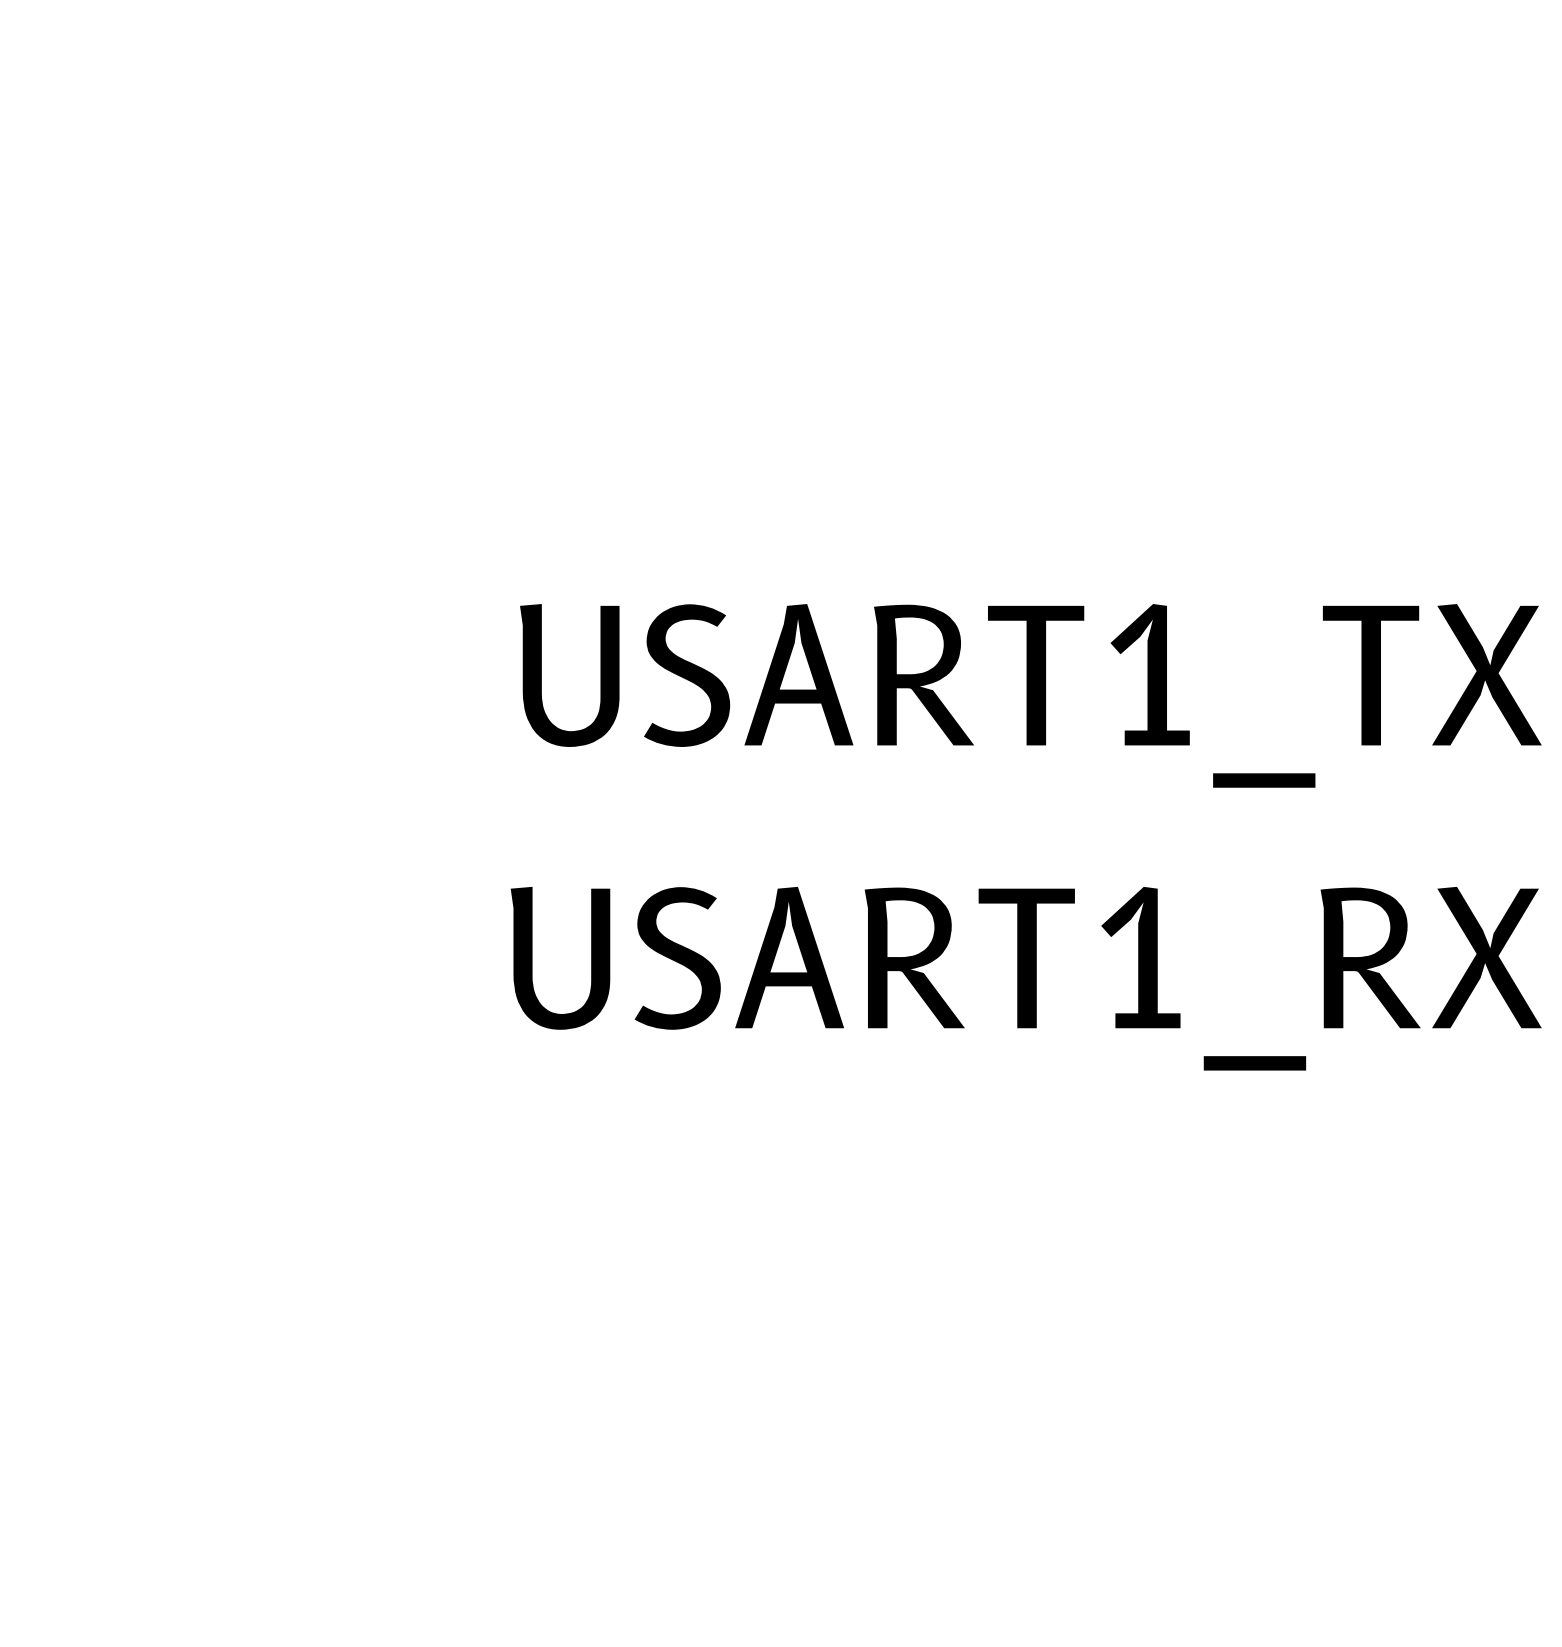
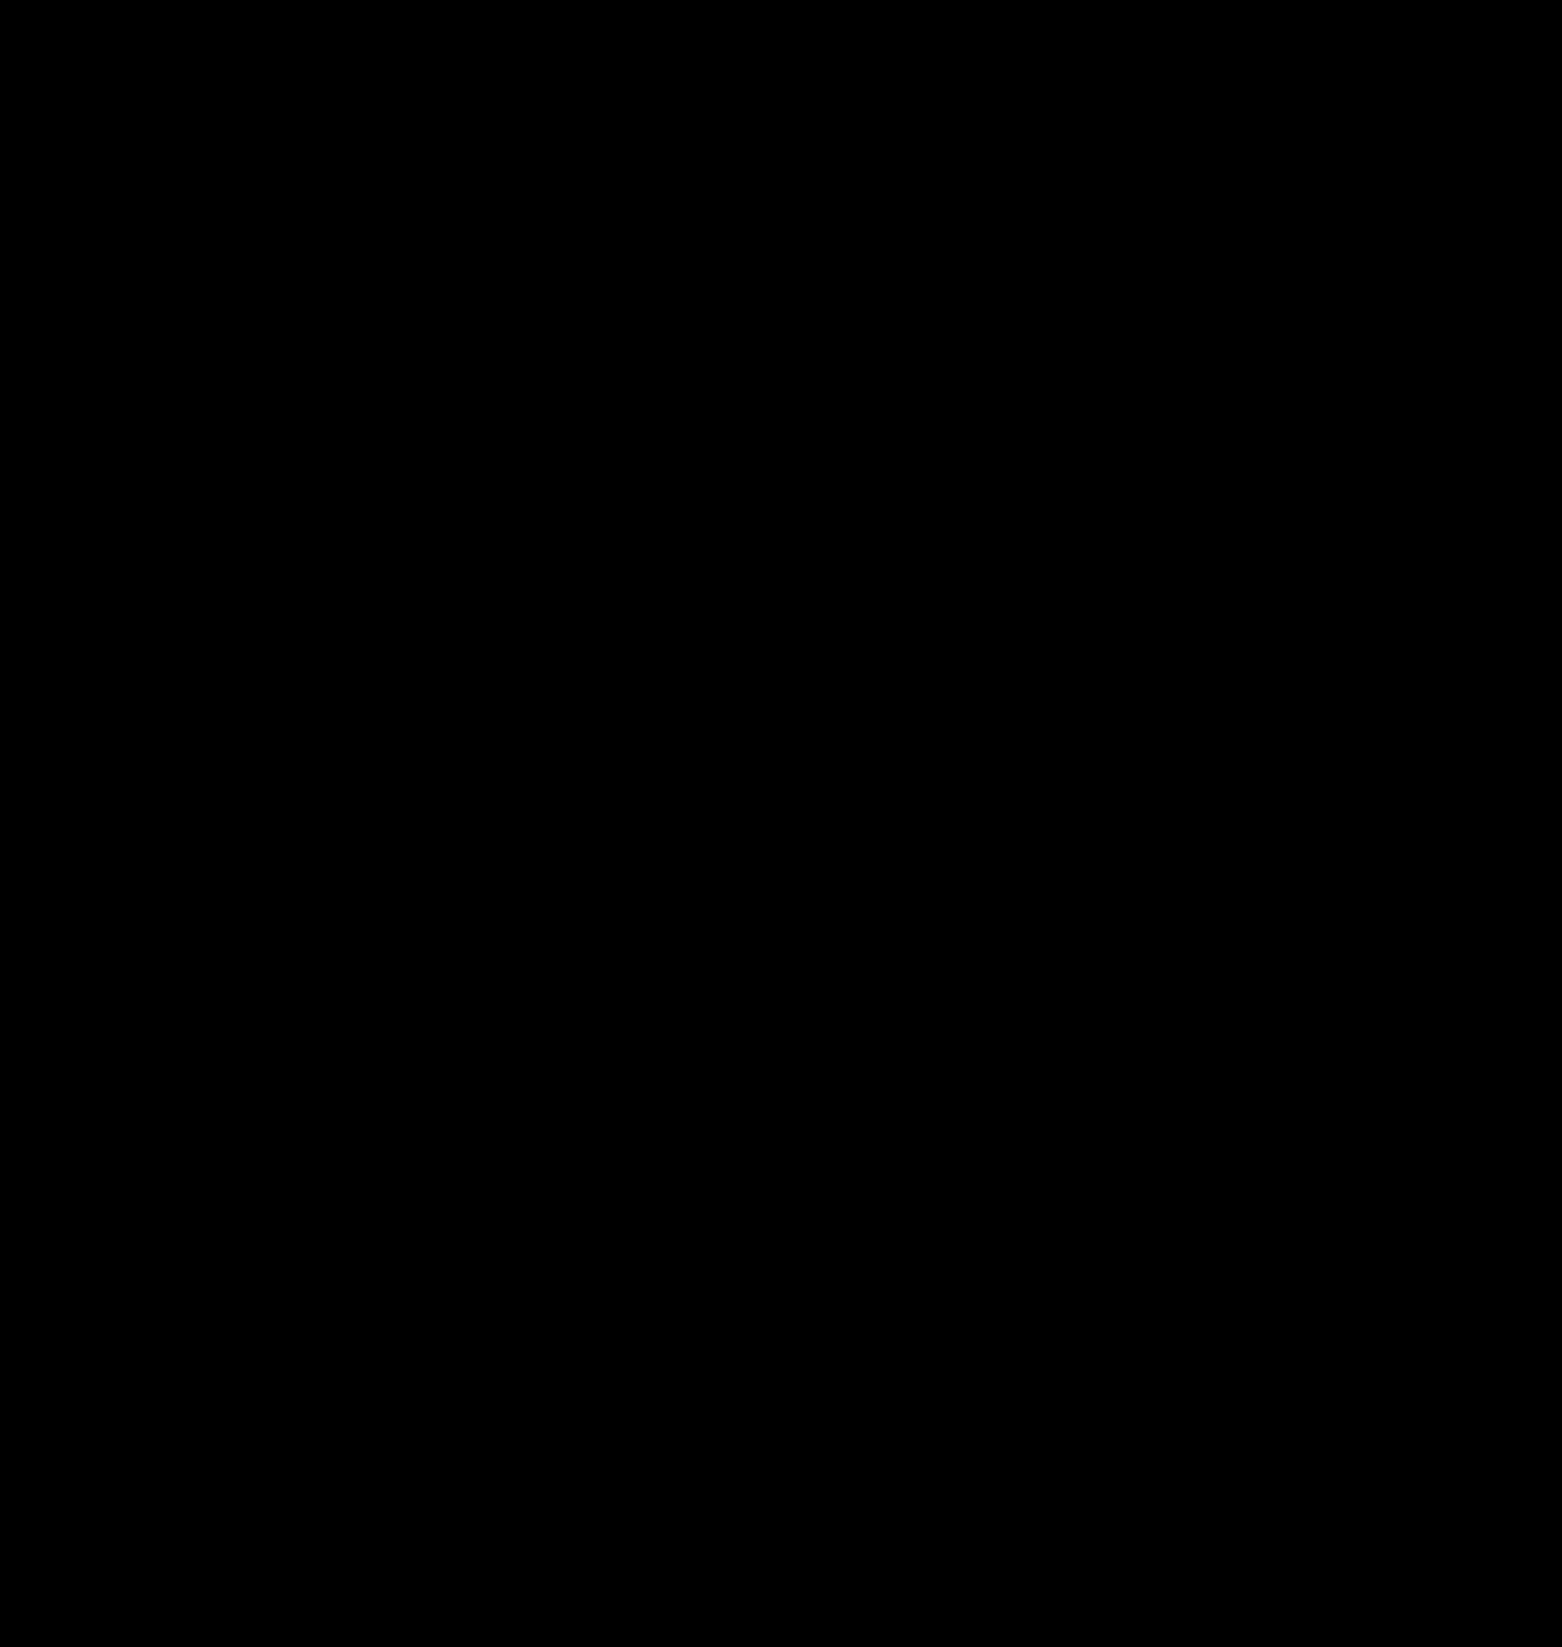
label: USART1_TX (1030, 695) -> none
label: USART1_RX (1026, 978) -> none

